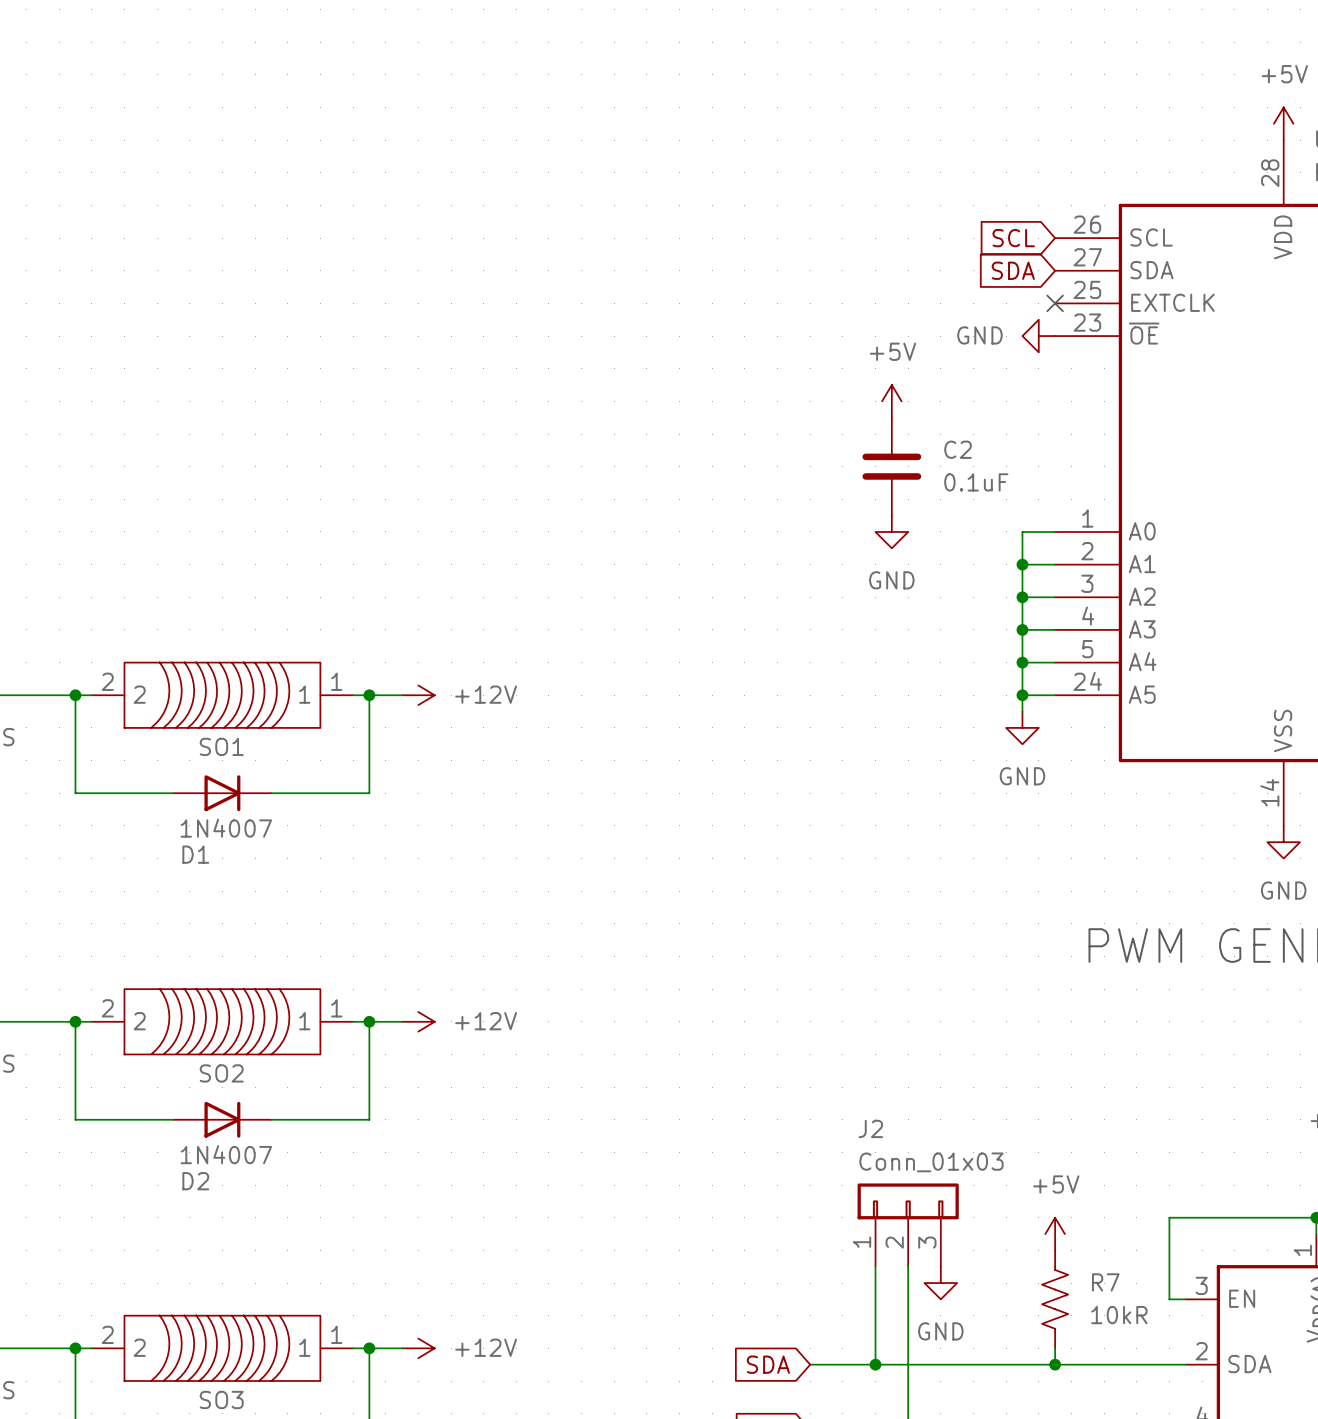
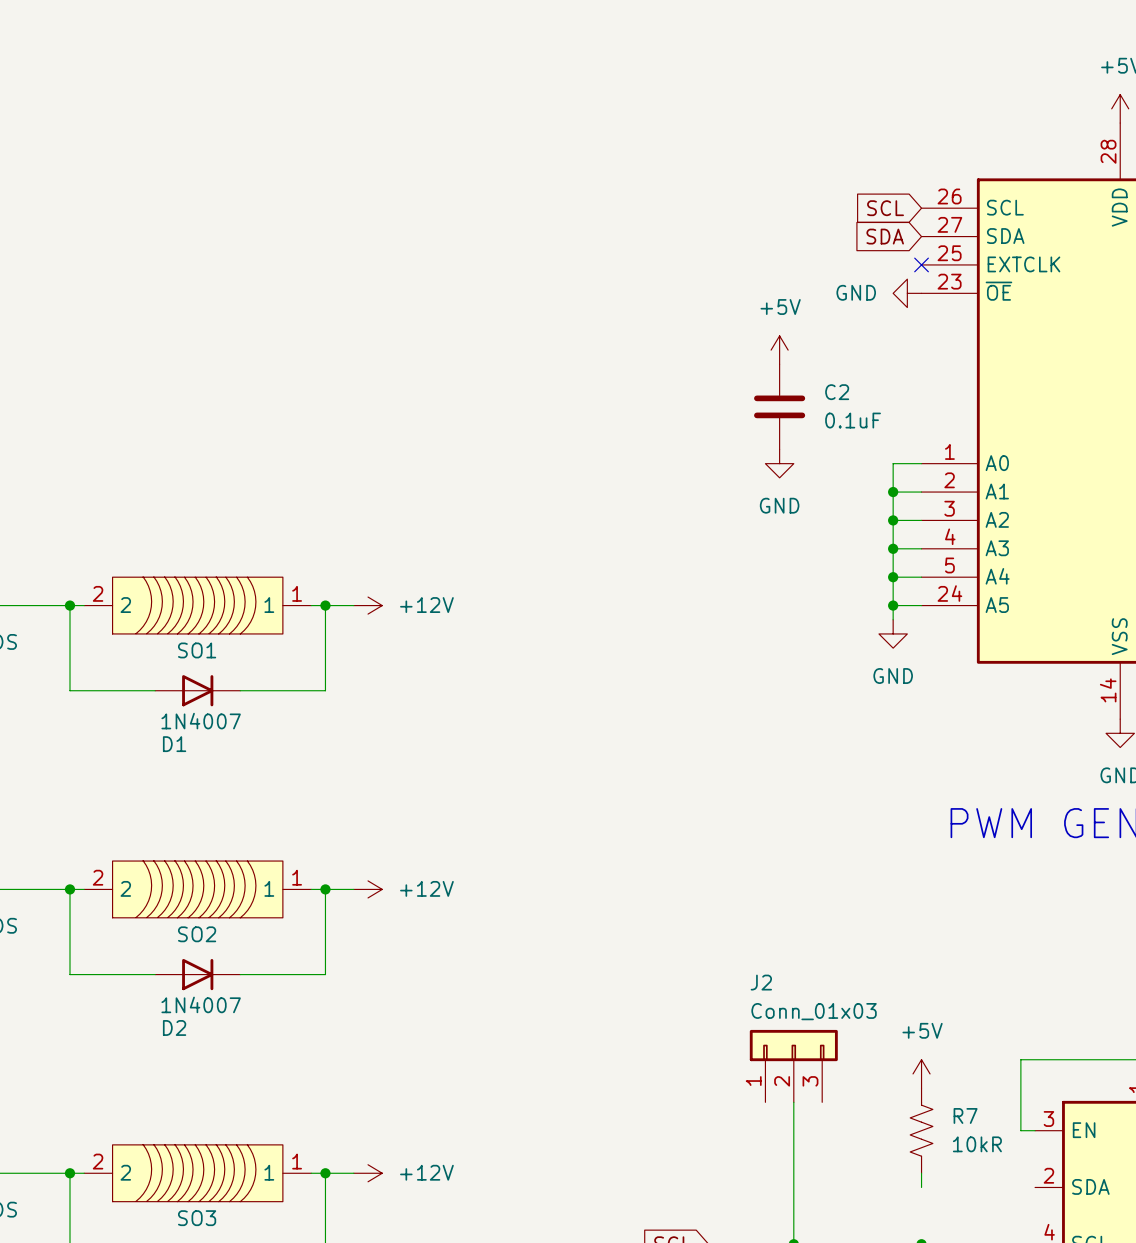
wire: (875, 1266) (875, 1364) -> none
power symbol: GND (940, 1283) -> none
global label: SDA (768, 1364) -> none
wire: (810, 1364) (1185, 1364) -> none
junction: (875, 1364) -> none
junction: (1055, 1364) -> none

